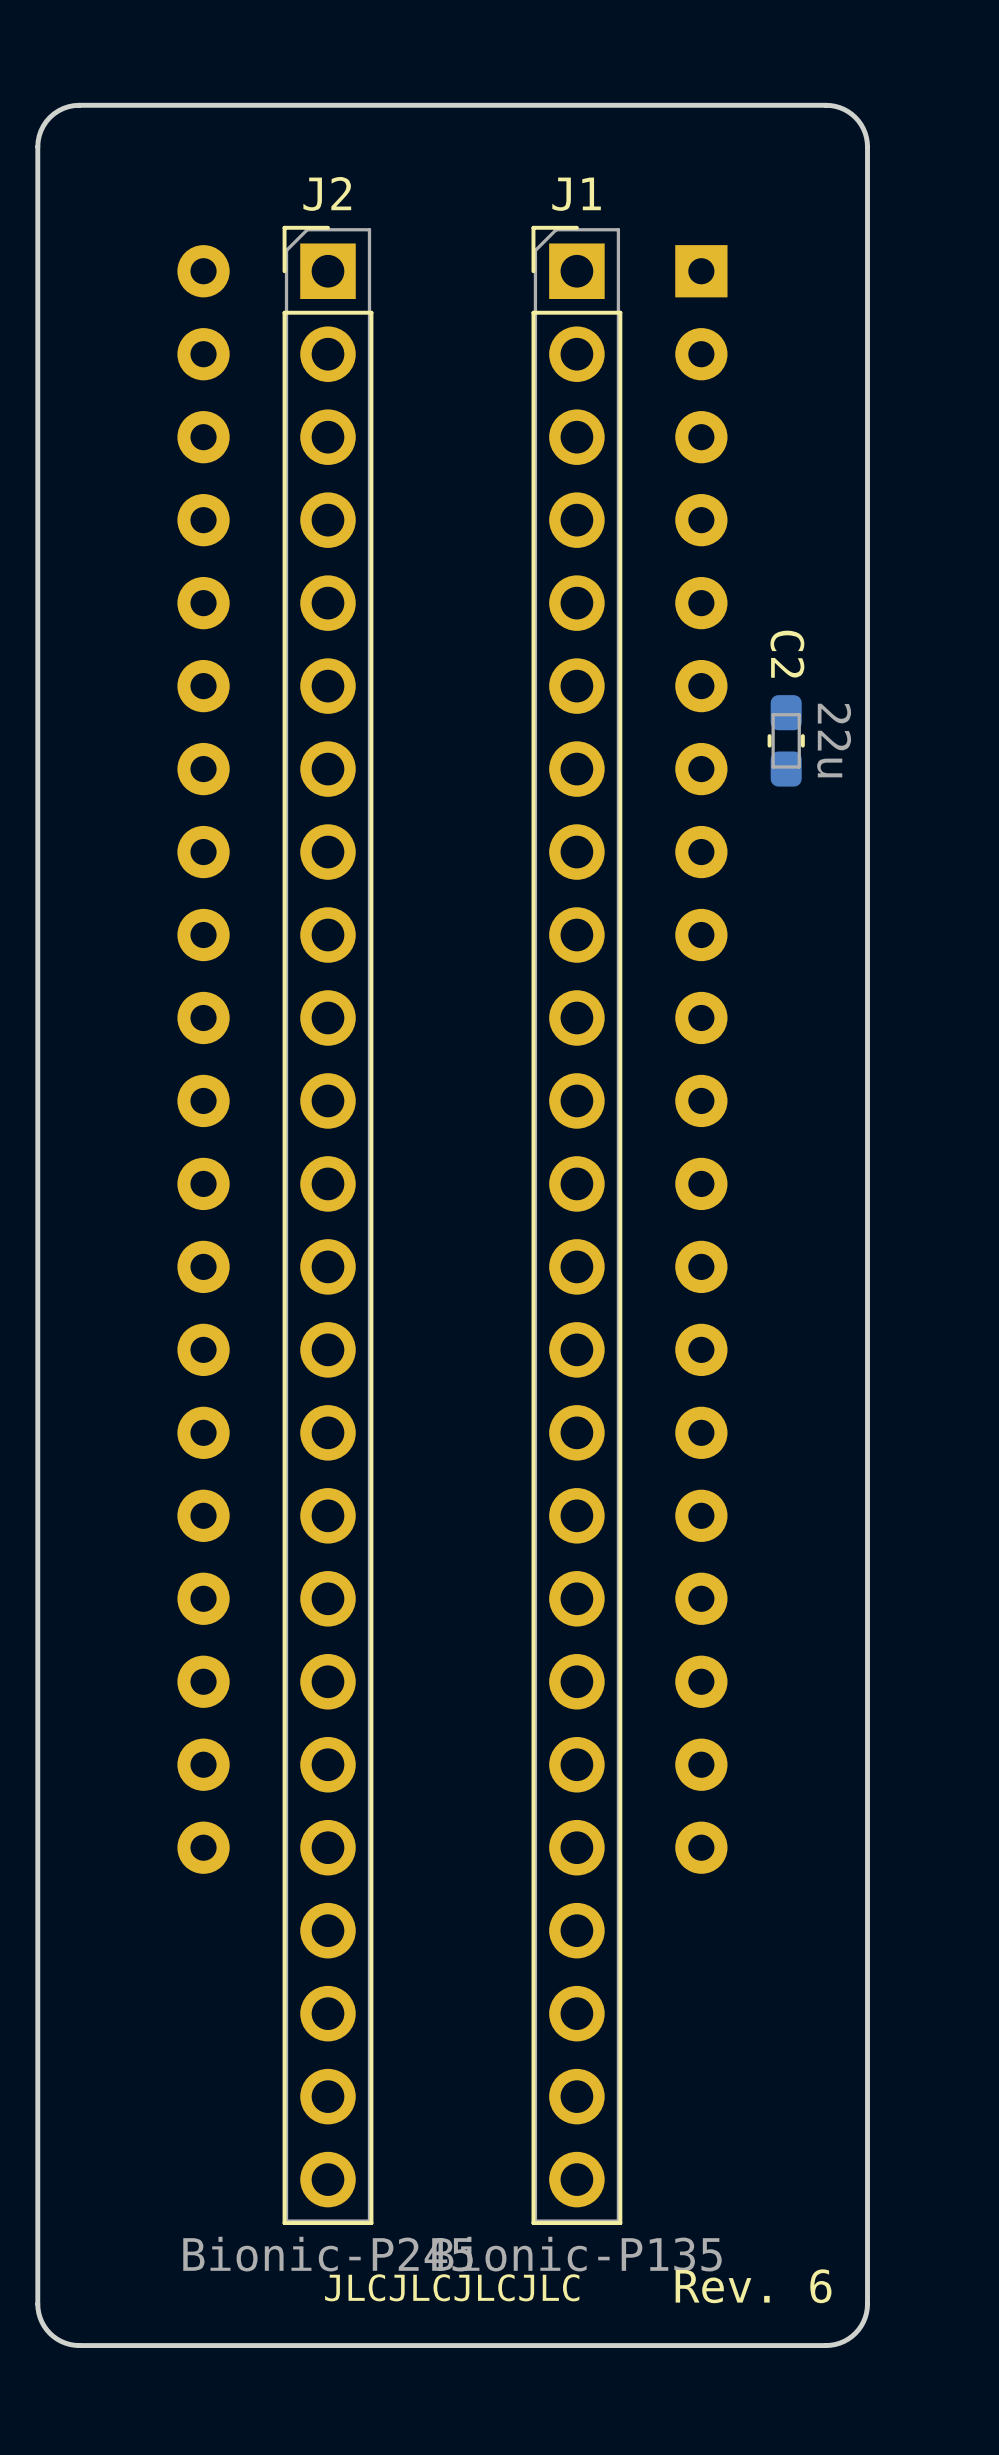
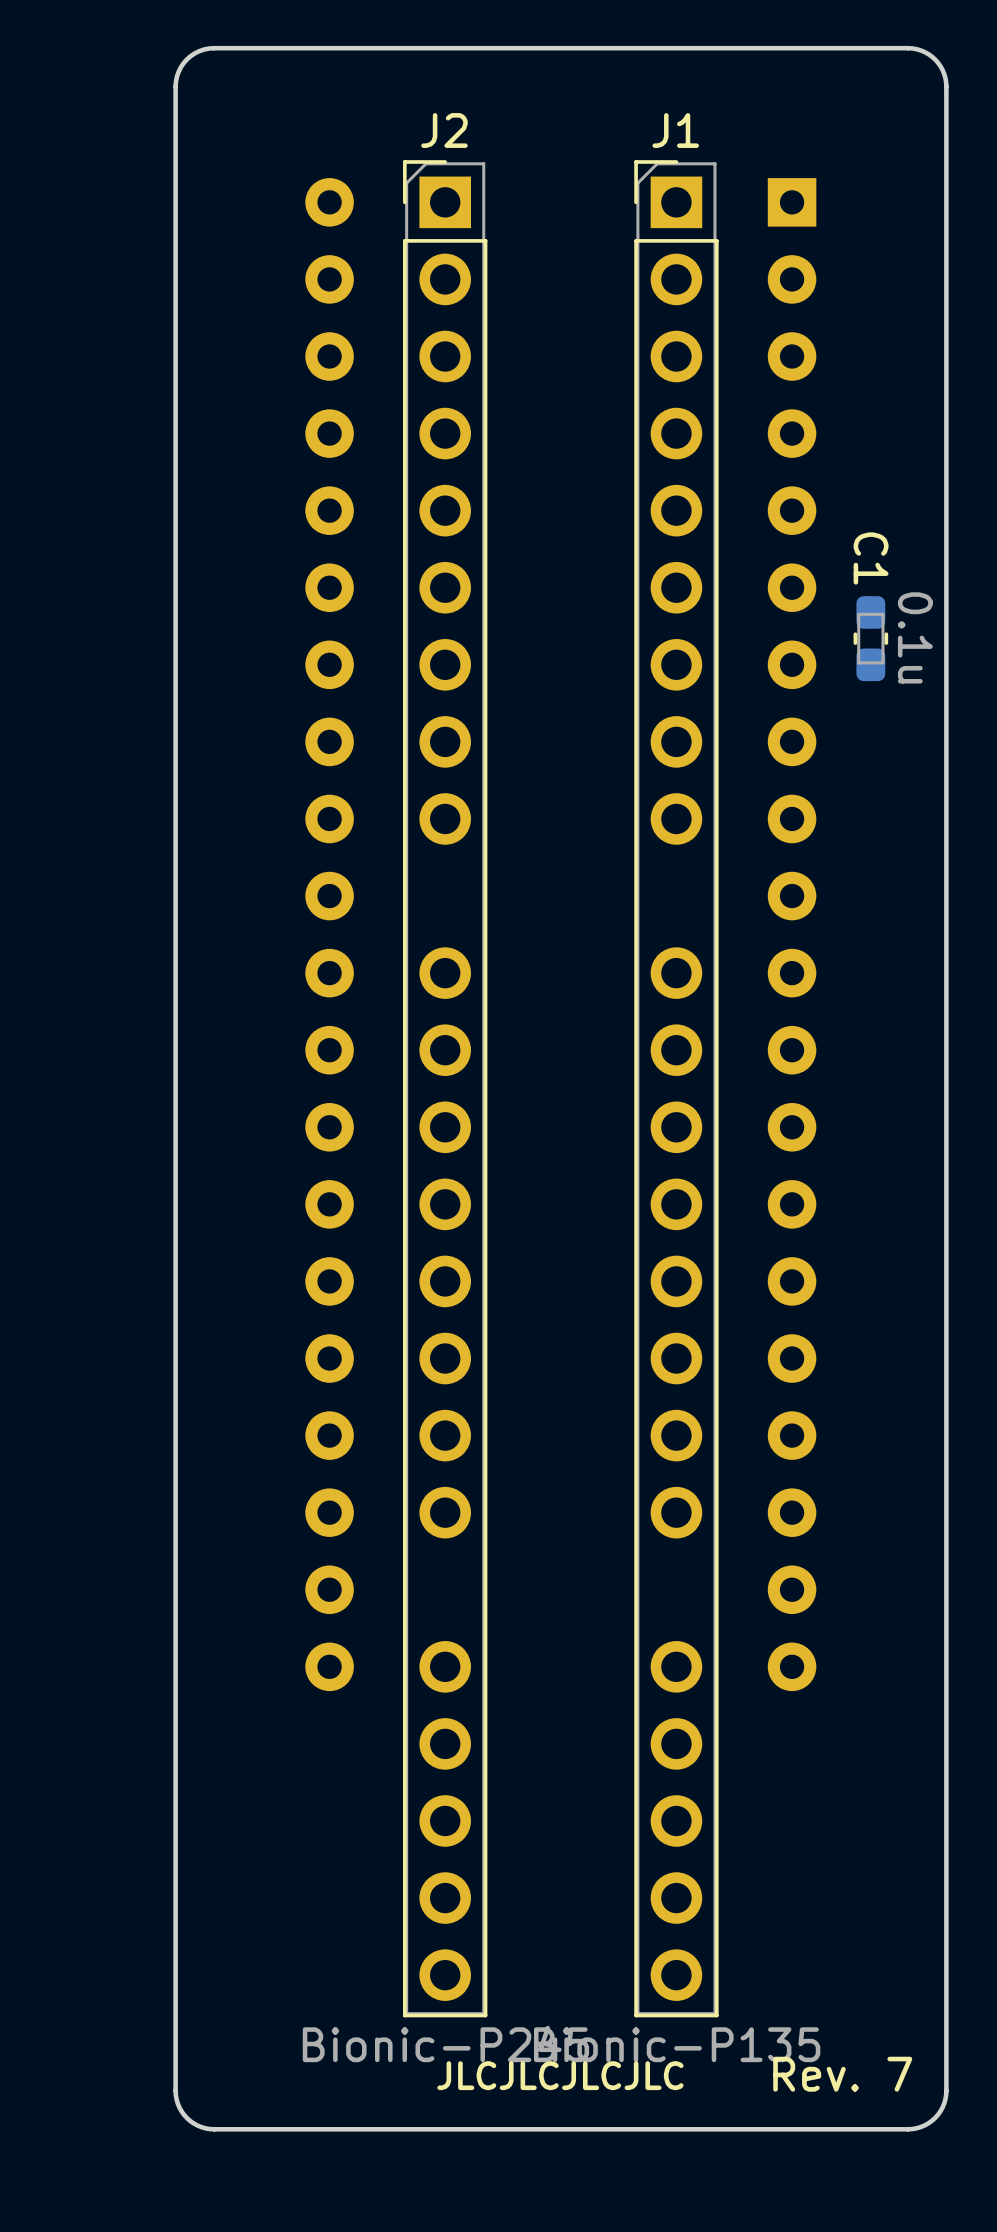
J2 footprint: [282, 225, 374, 2226] -> [403, 160, 488, 2018]
J1 footprint: [531, 225, 623, 2226] -> [634, 160, 719, 2018]
C2 name: C2 (787, 654) -> C1 (871, 558)
C2 value: 22u (834, 740) -> 0.1u (915, 637)
text: Rev. 6 (753, 2286) -> Rev. 7 (842, 2074)

